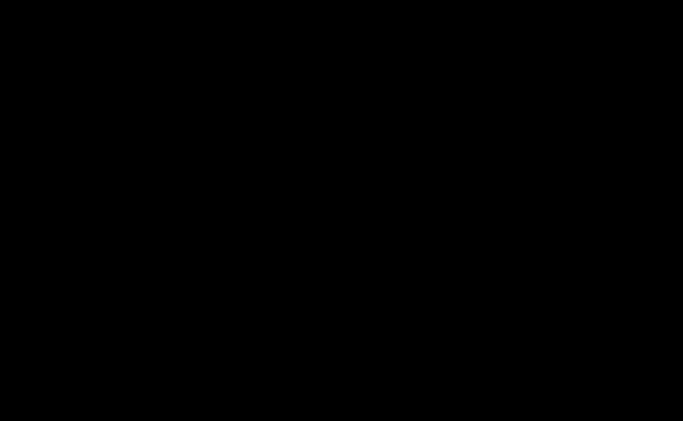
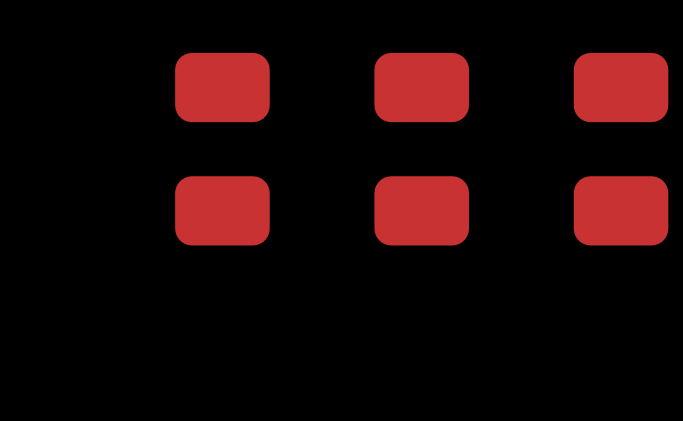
part: none -> (222, 149)
part: none -> (421, 149)
part: none -> (621, 149)

